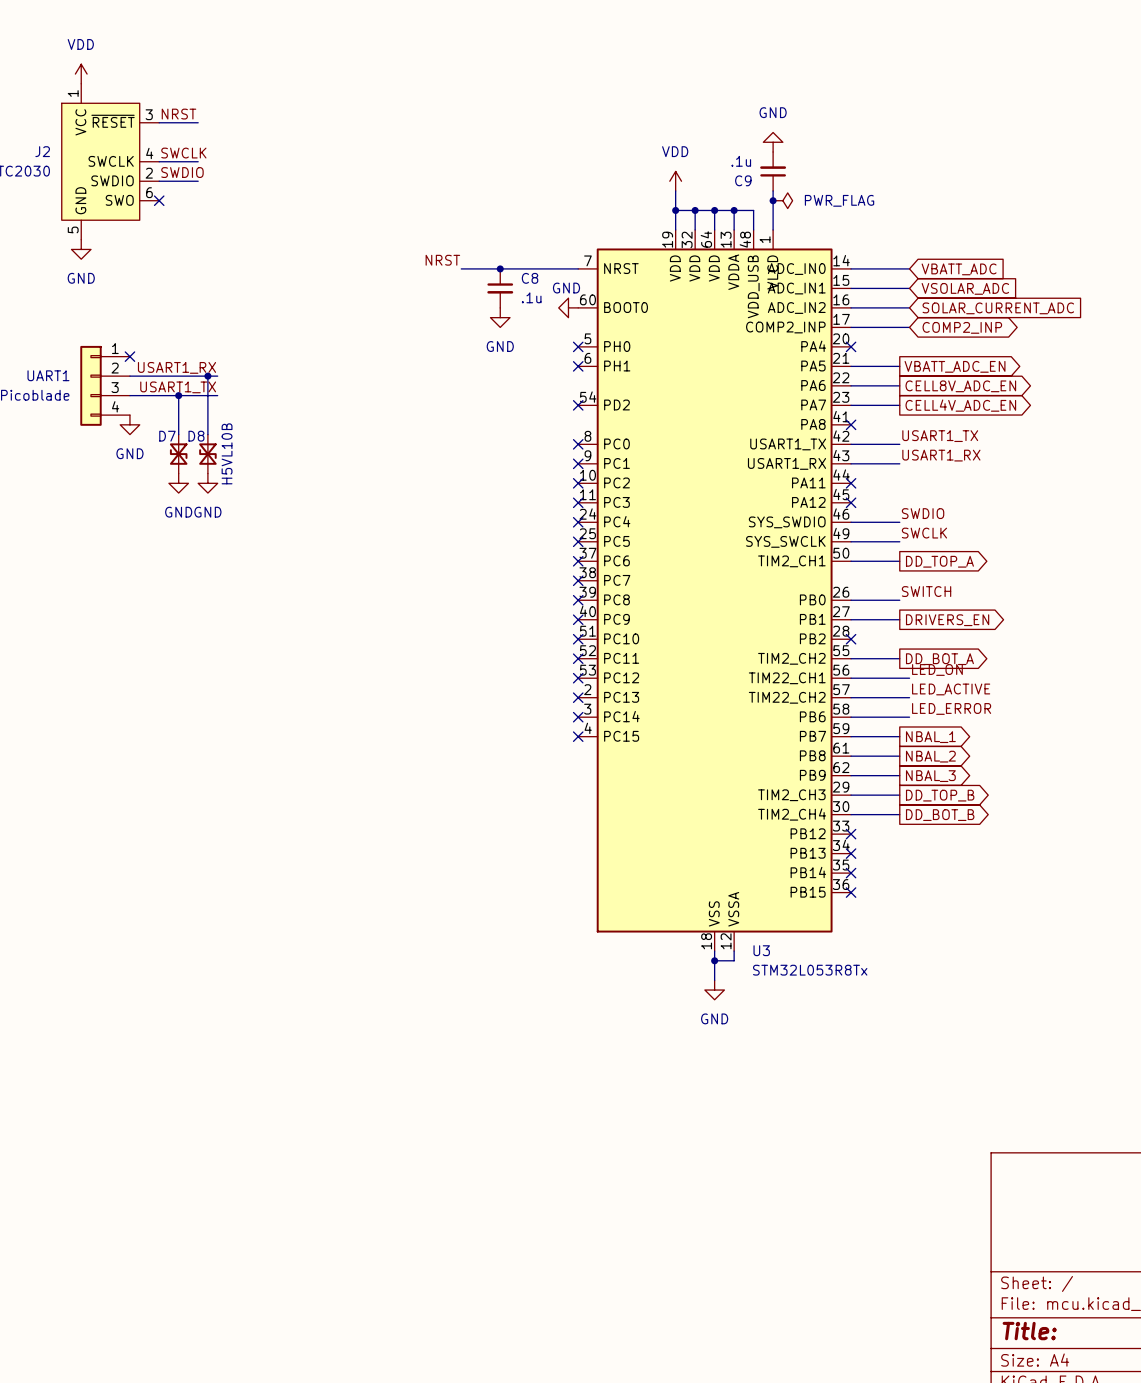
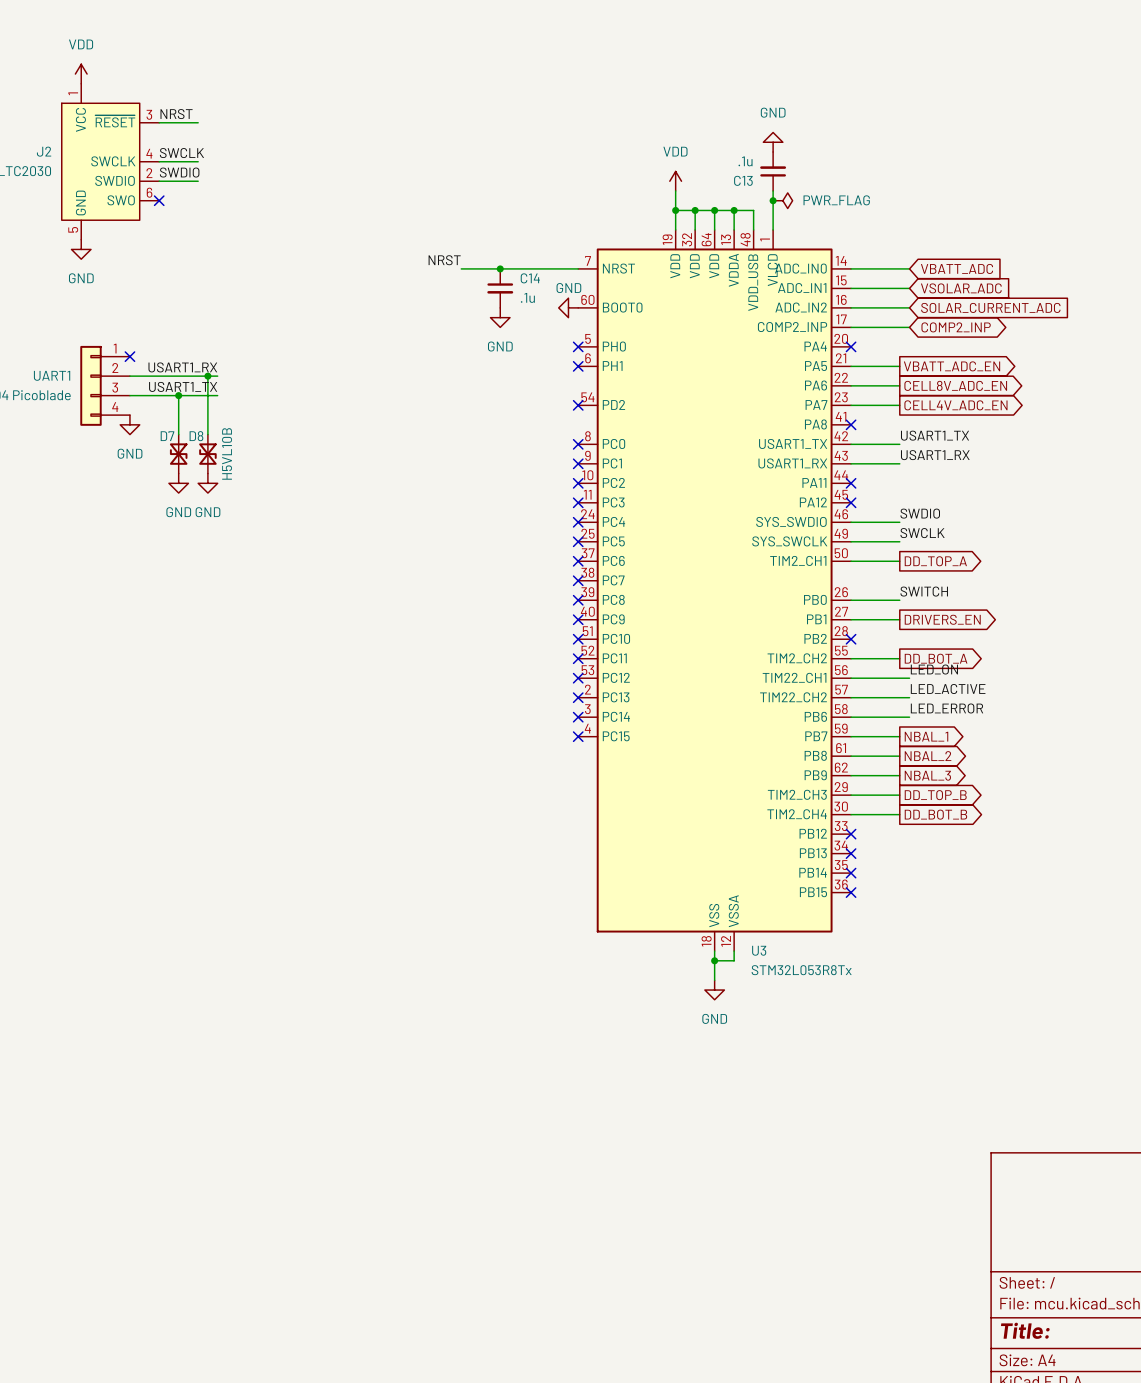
C9 name: C9 (743, 180) -> C13 (743, 180)
C8 name: C8 (530, 278) -> C14 (530, 278)

